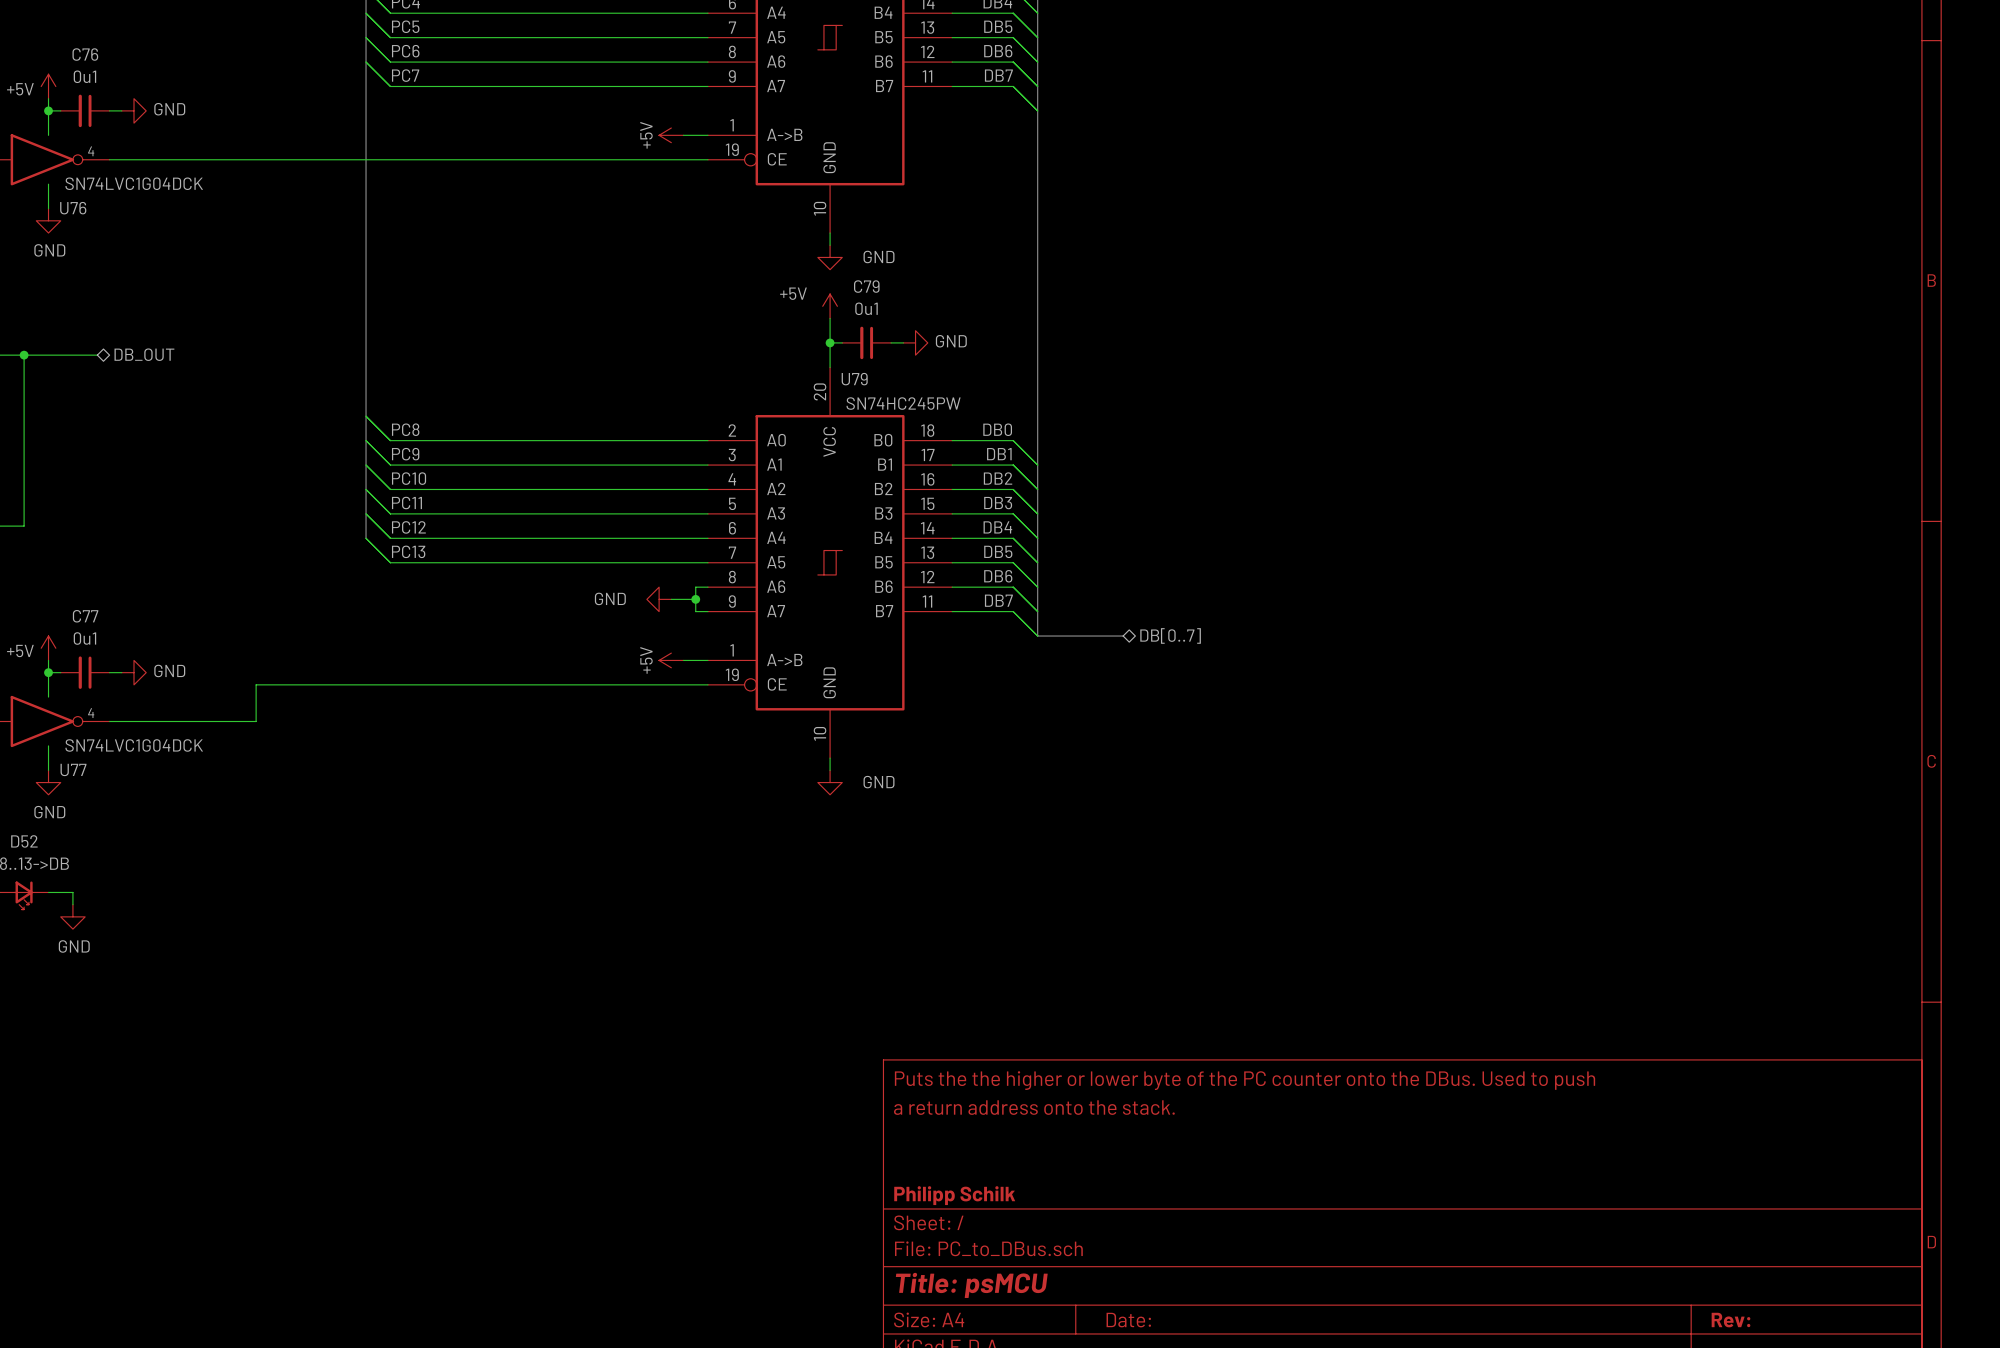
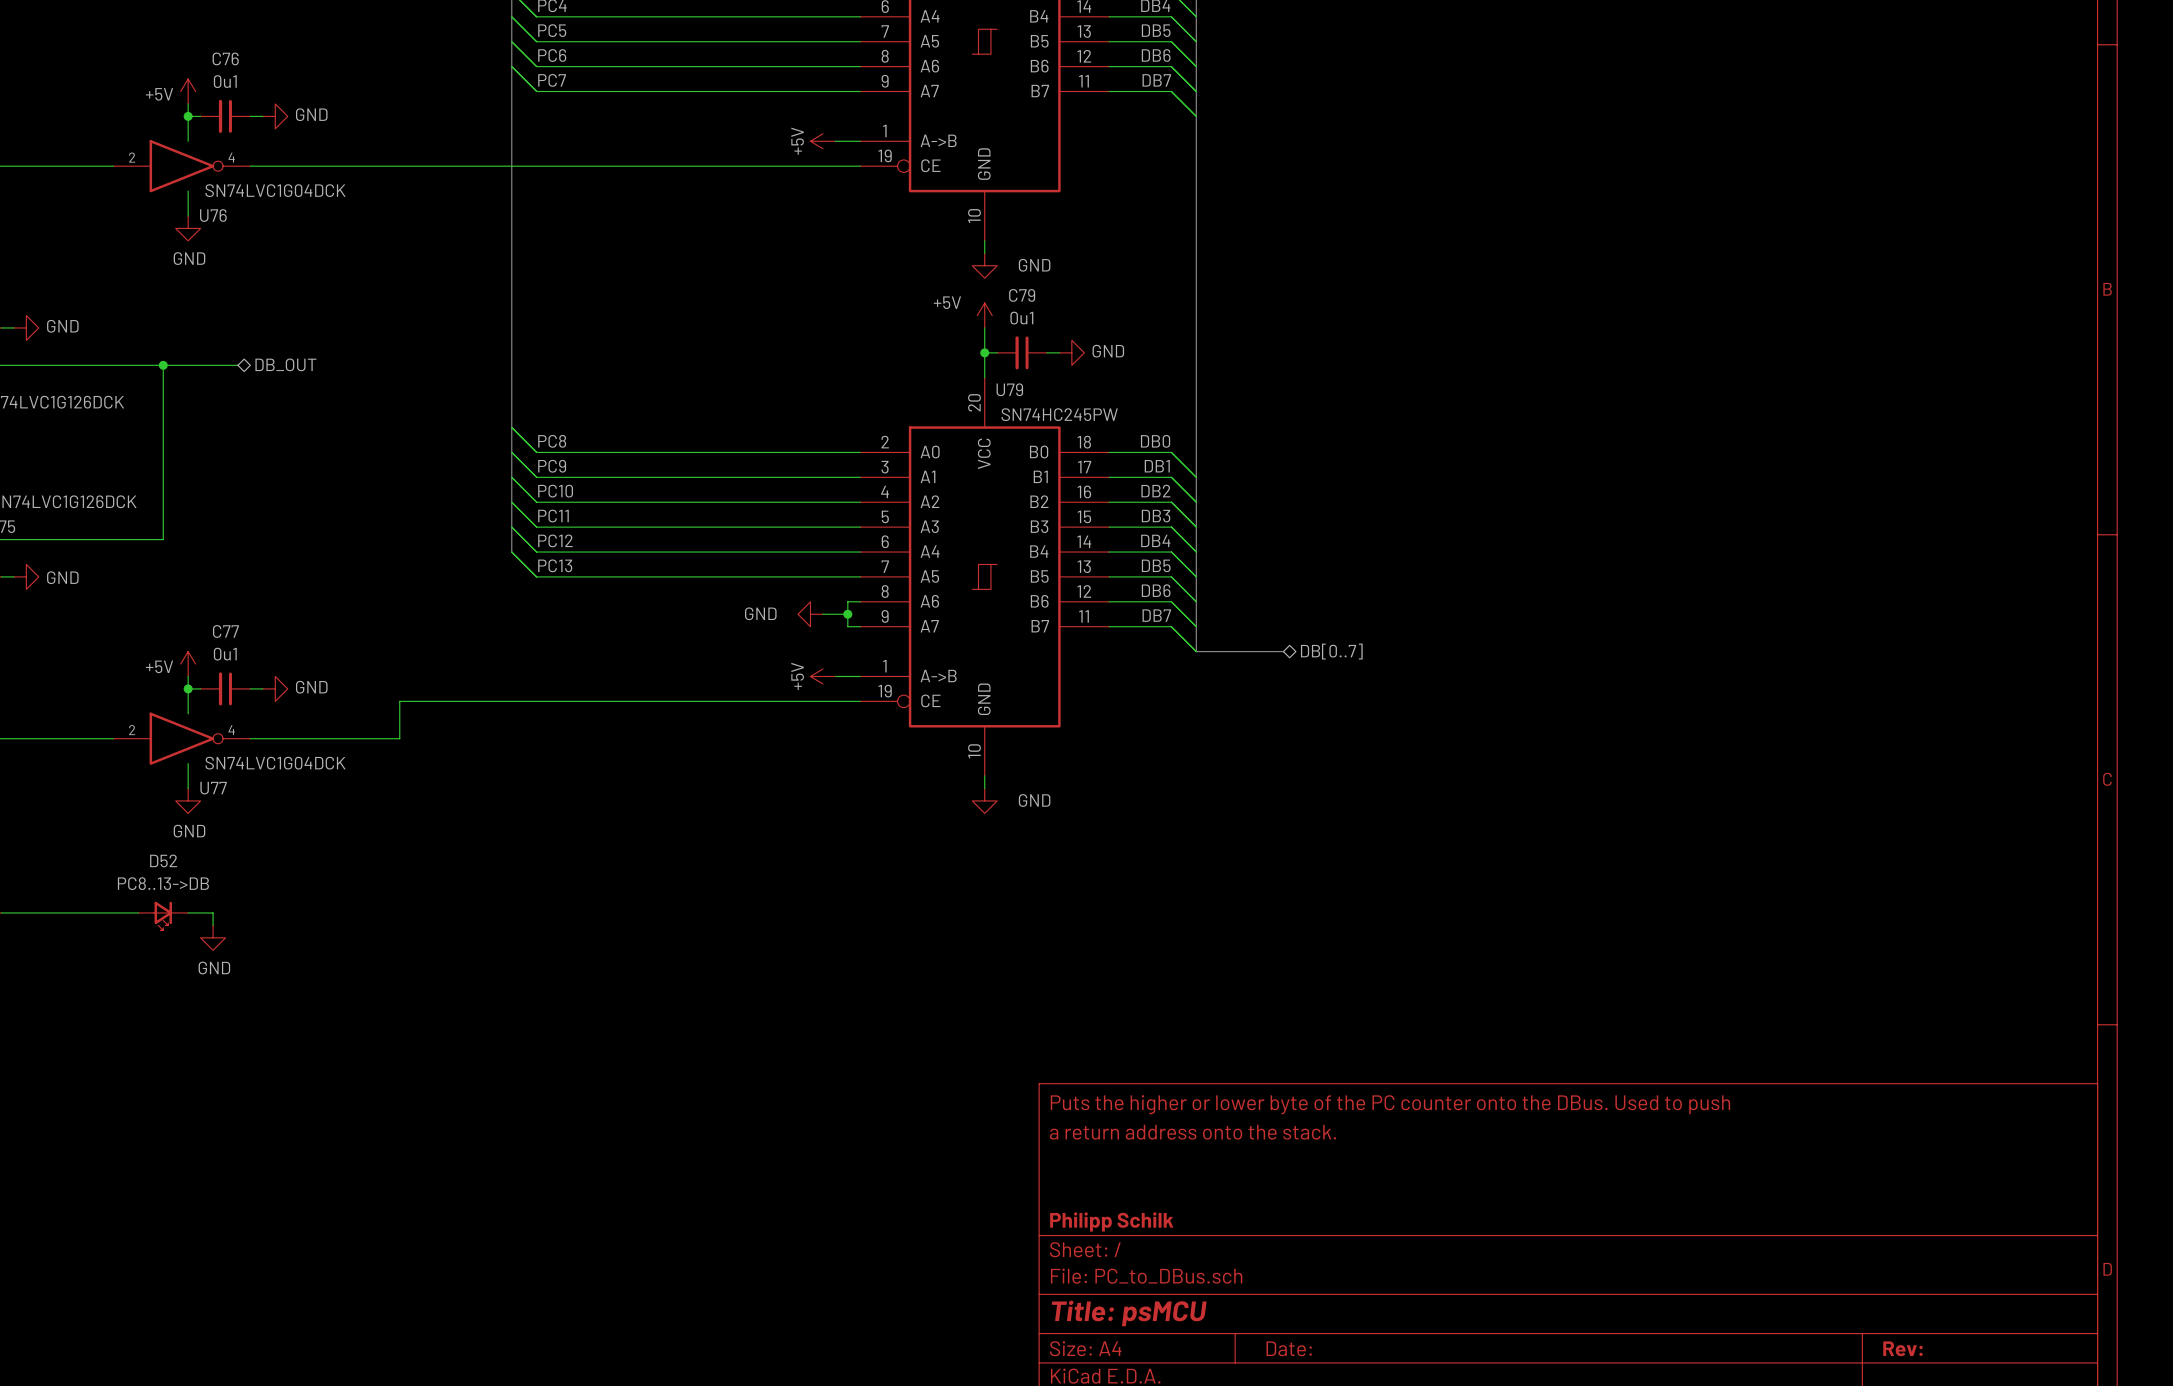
title block: Puts the the higher or lower byte of the PC counter onto the DBus. Used to push (1245, 1080) -> Puts the higher or lower byte of the PC counter onto the DBus. Used to push (1390, 1104)

